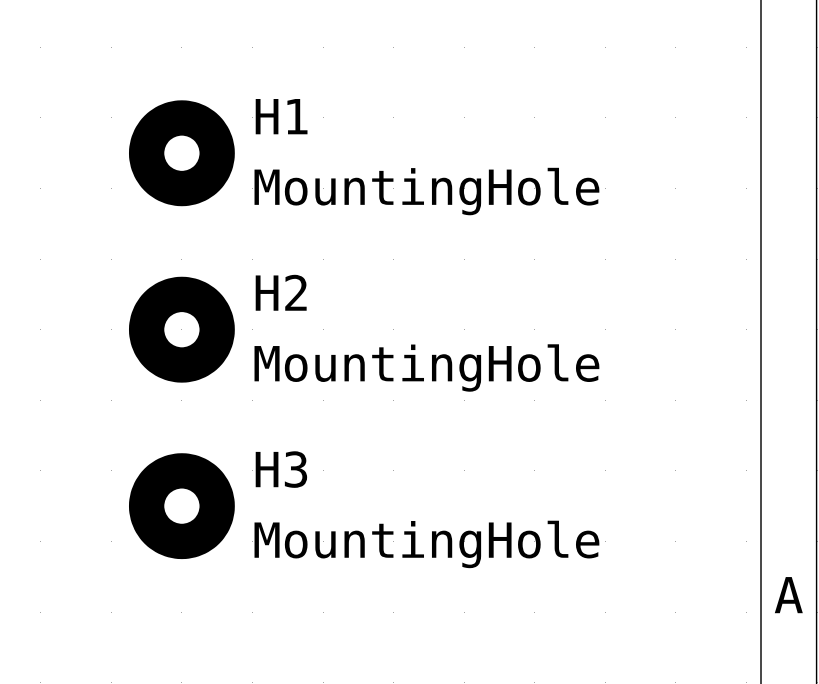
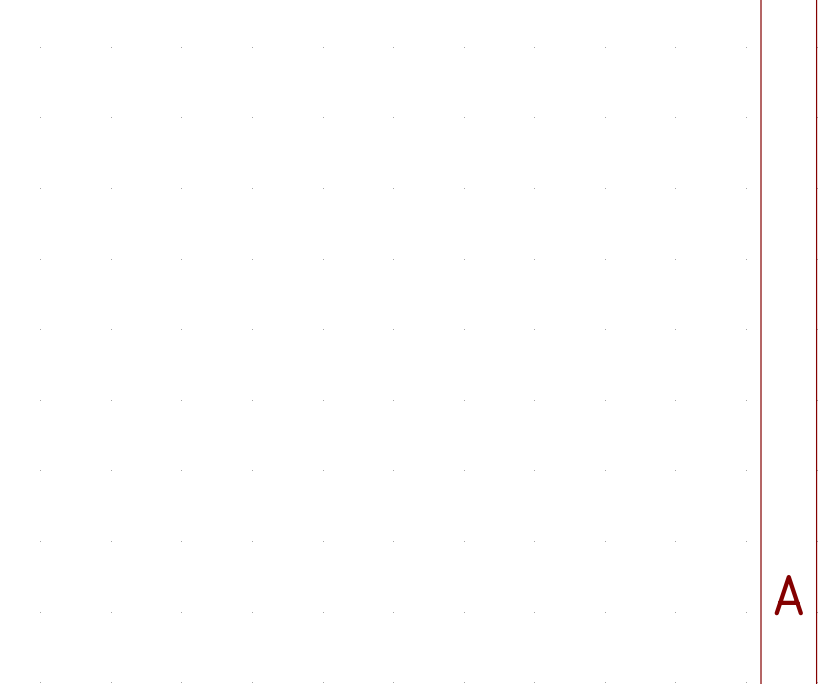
H1: MountingHole (181, 153) -> none
H2: MountingHole (181, 329) -> none
H3: MountingHole (181, 506) -> none

